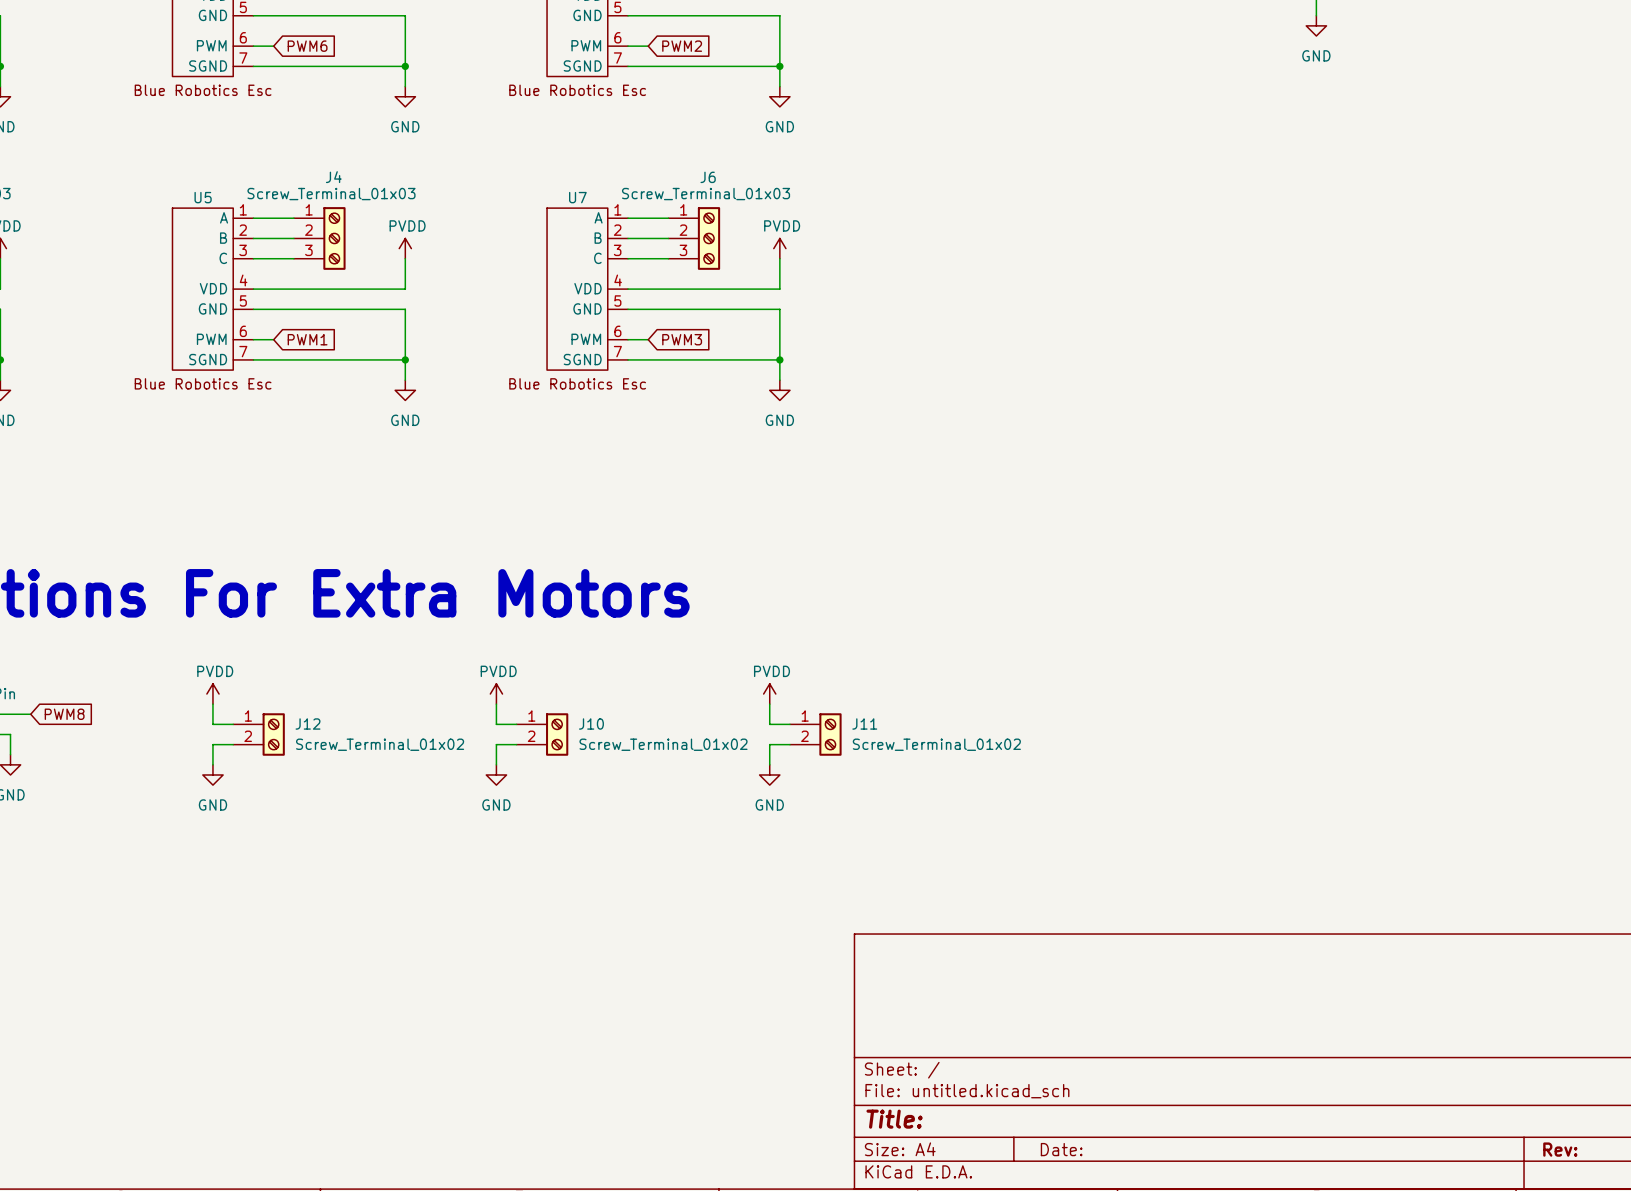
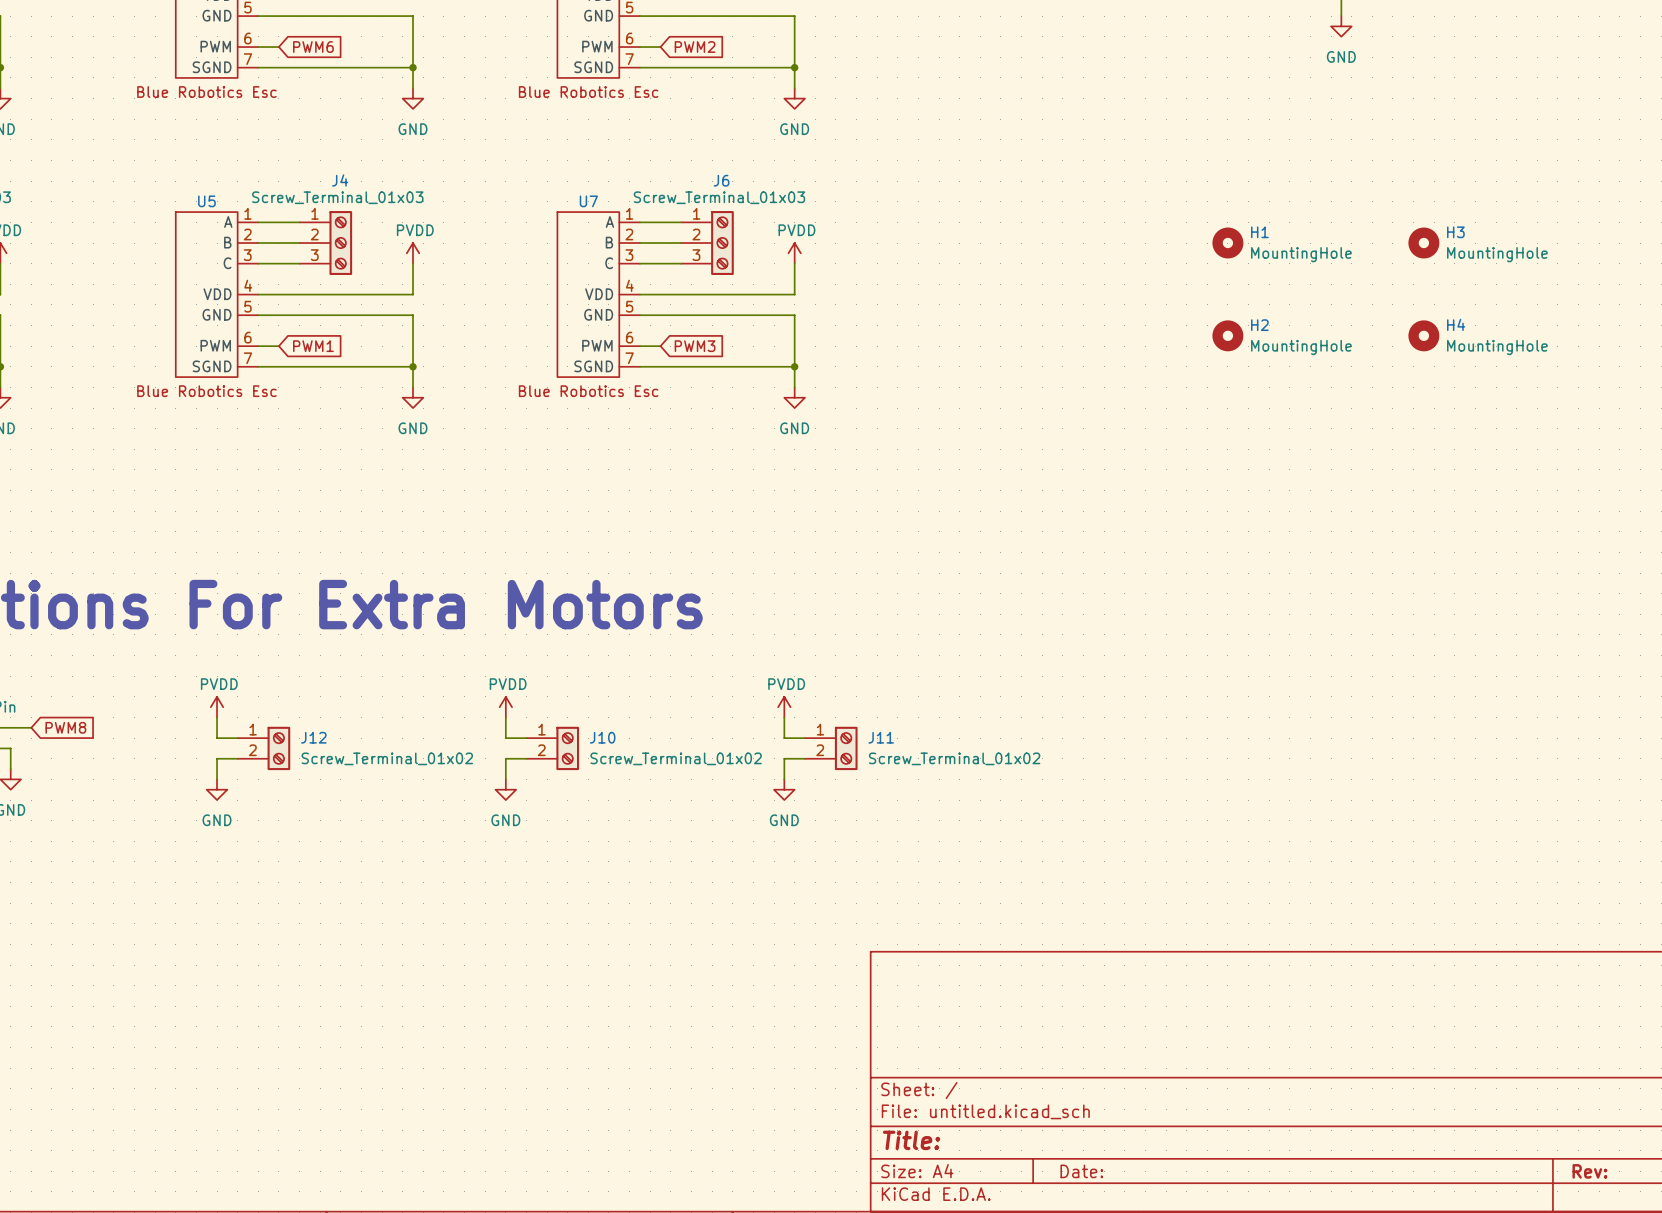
H1: none -> MountingHole (1227, 243)
H3: none -> MountingHole (1423, 243)
H2: none -> MountingHole (1227, 335)
H4: none -> MountingHole (1423, 335)

